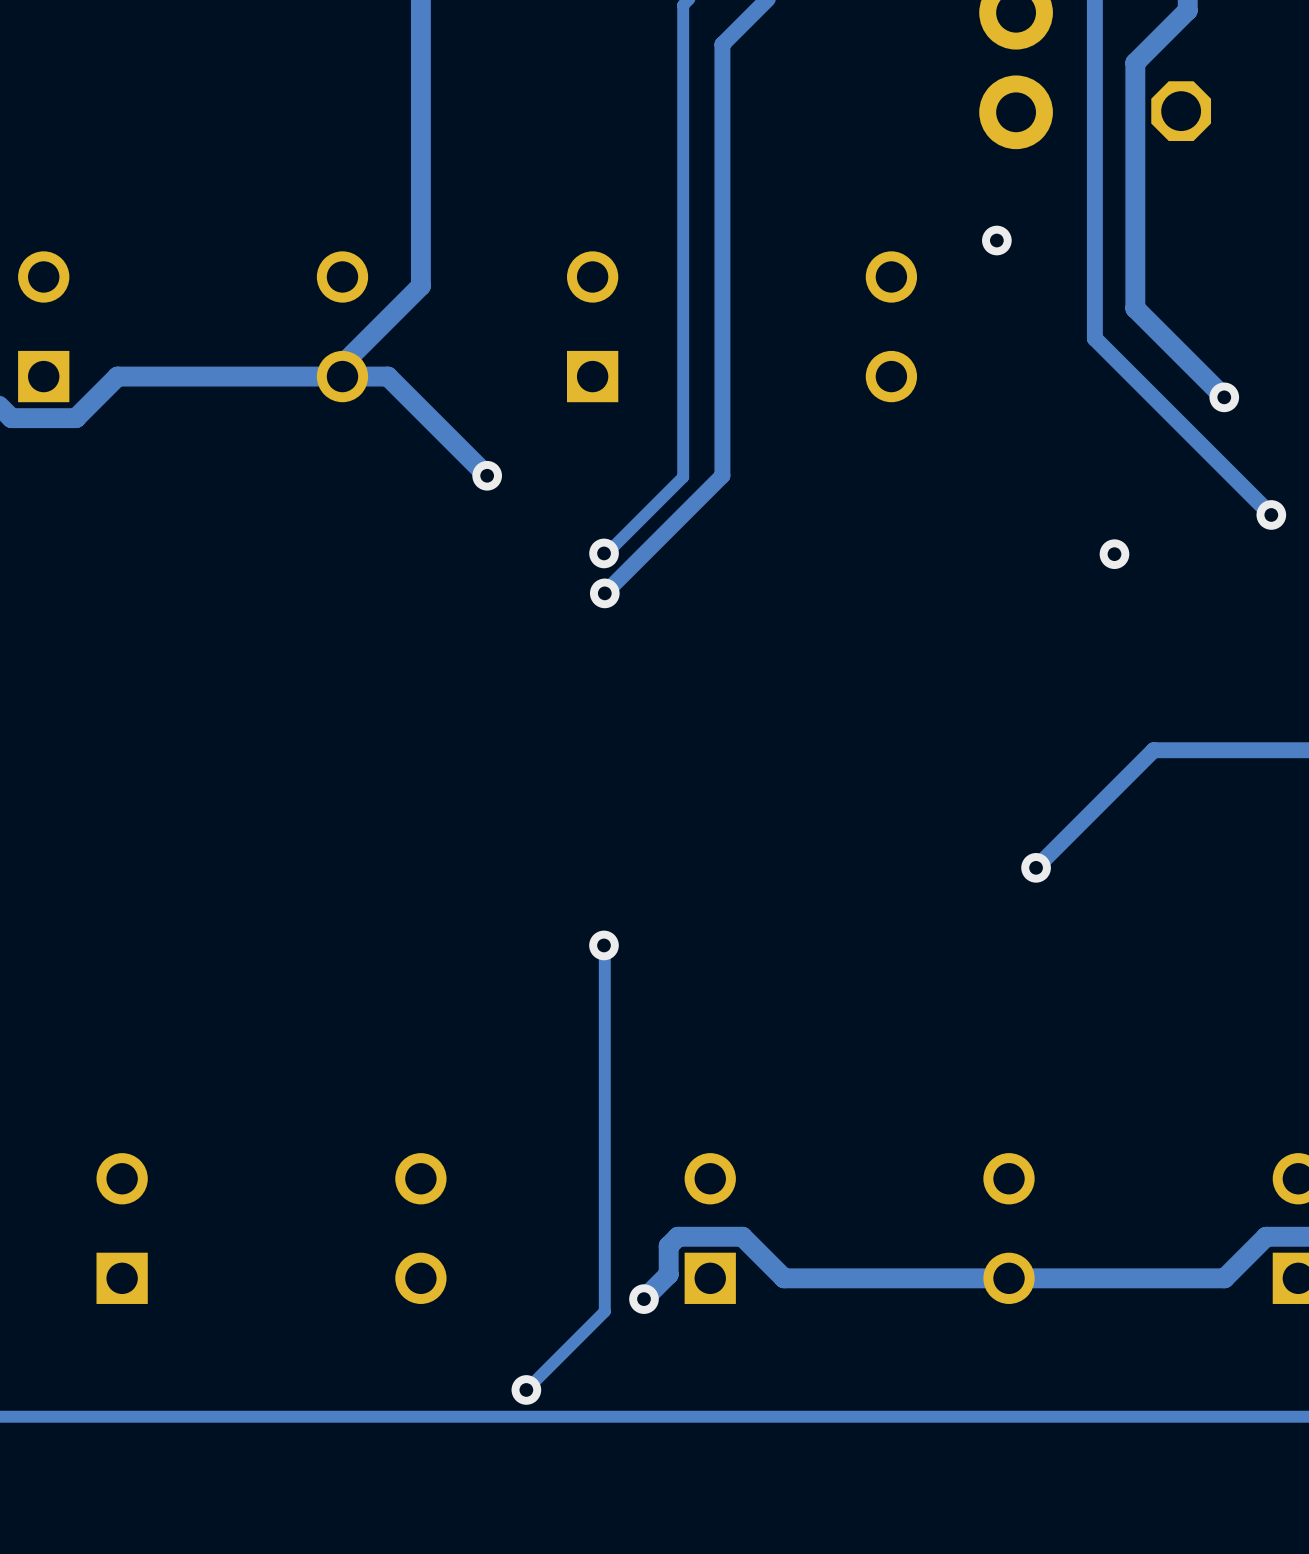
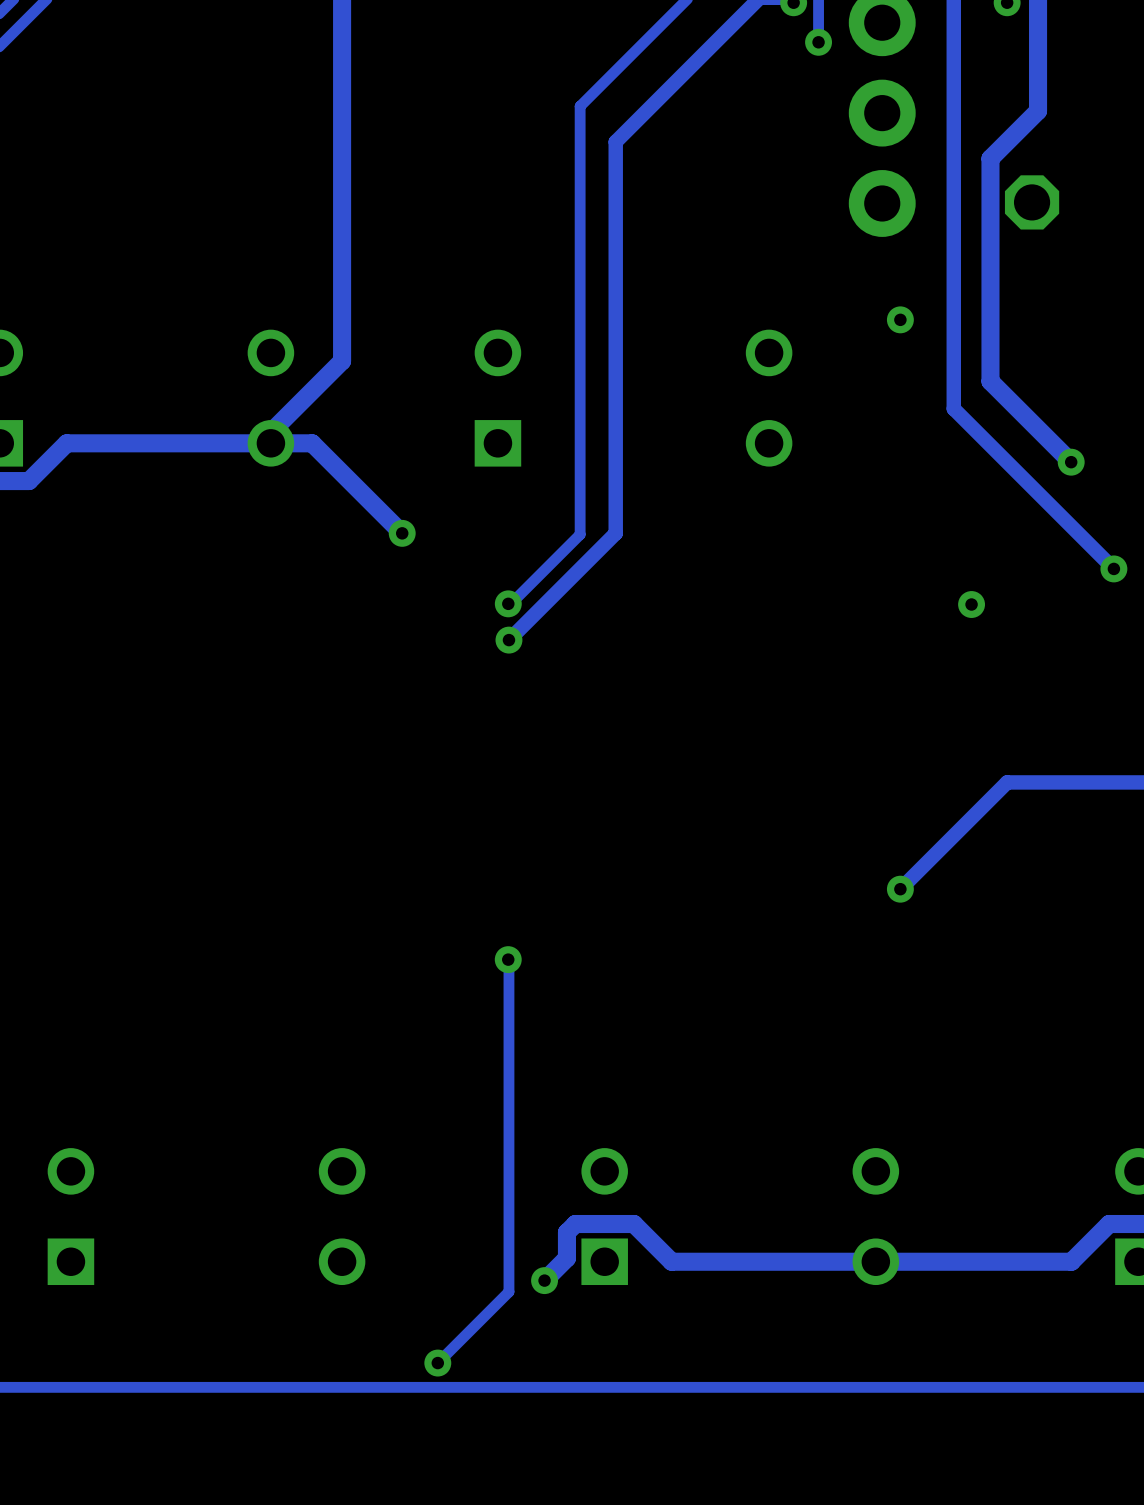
via position: (996, 240) -> (900, 319)

